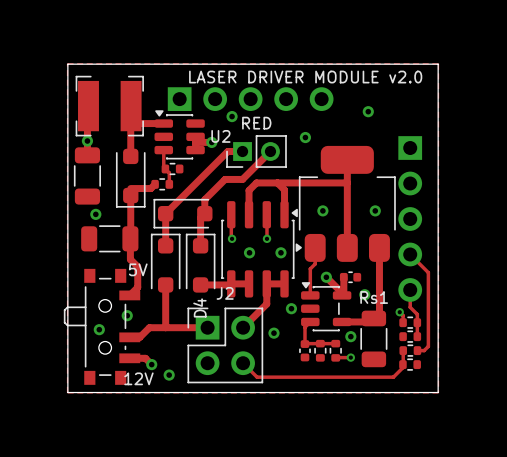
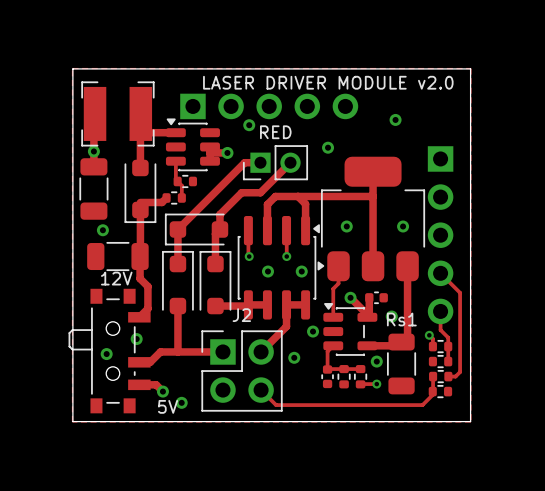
U2 name: U2 (220, 136) -> none
text: none -> 12V (116, 278)
text: 5V (138, 269) -> none
D4 name: D4 (199, 307) -> none
text: 12V (138, 378) -> 5V (168, 406)

